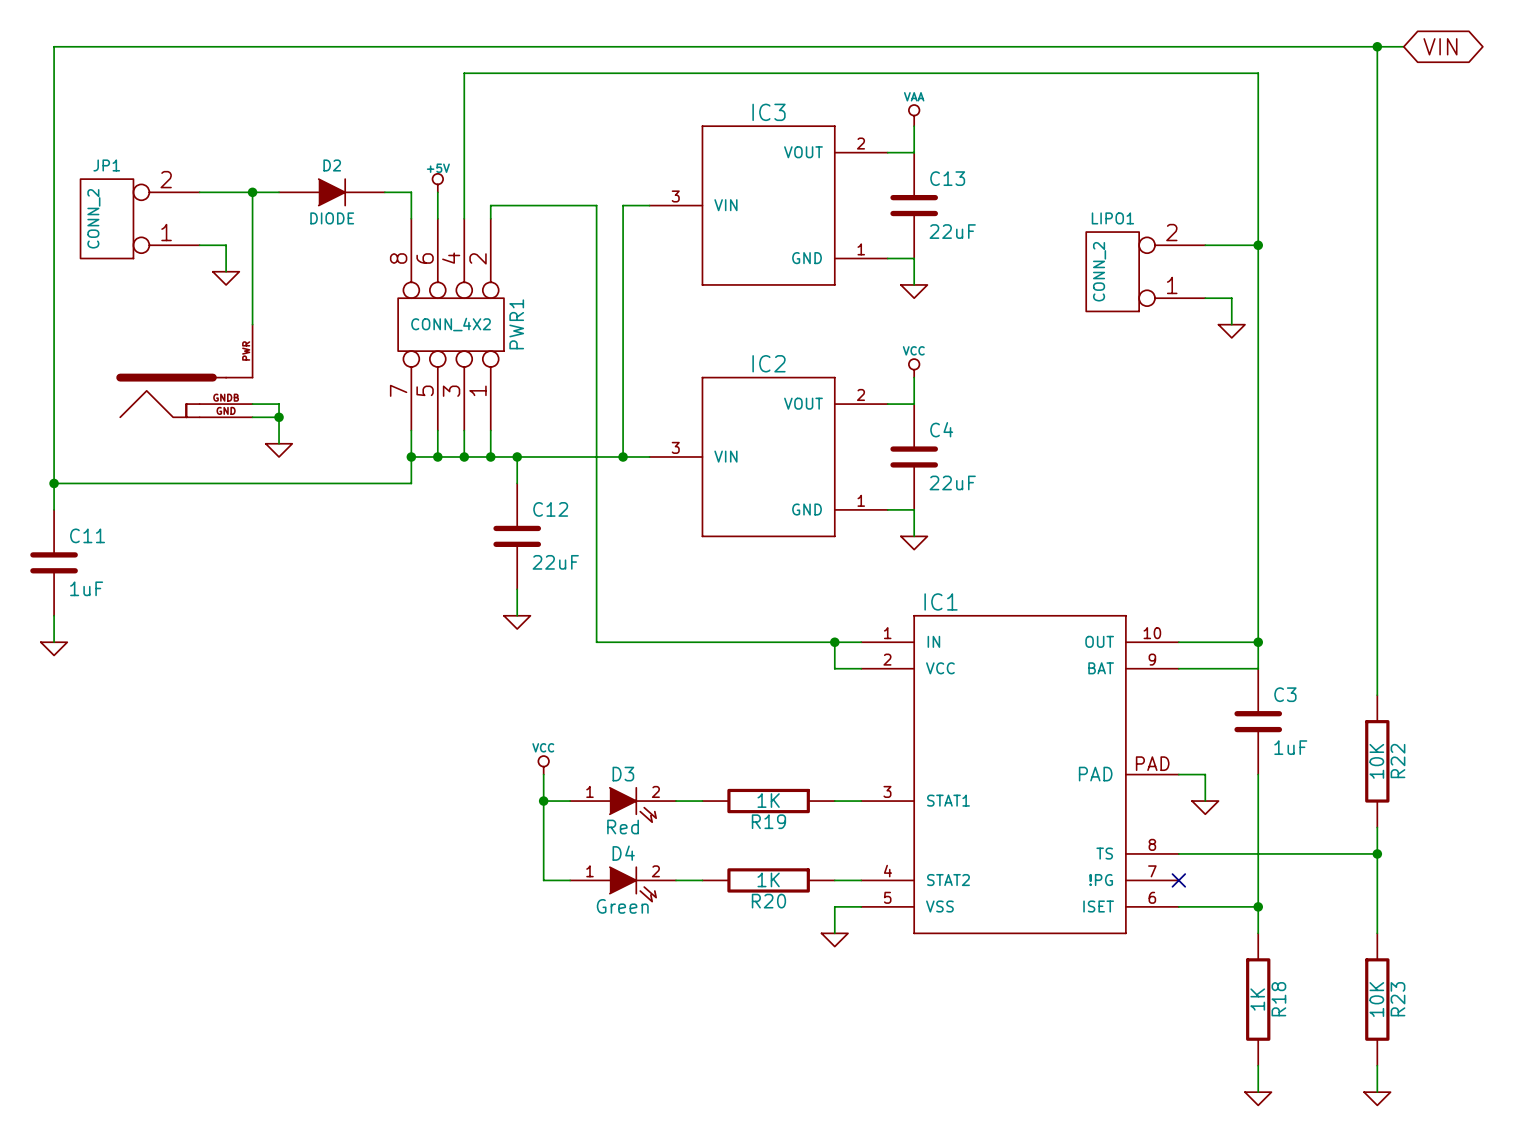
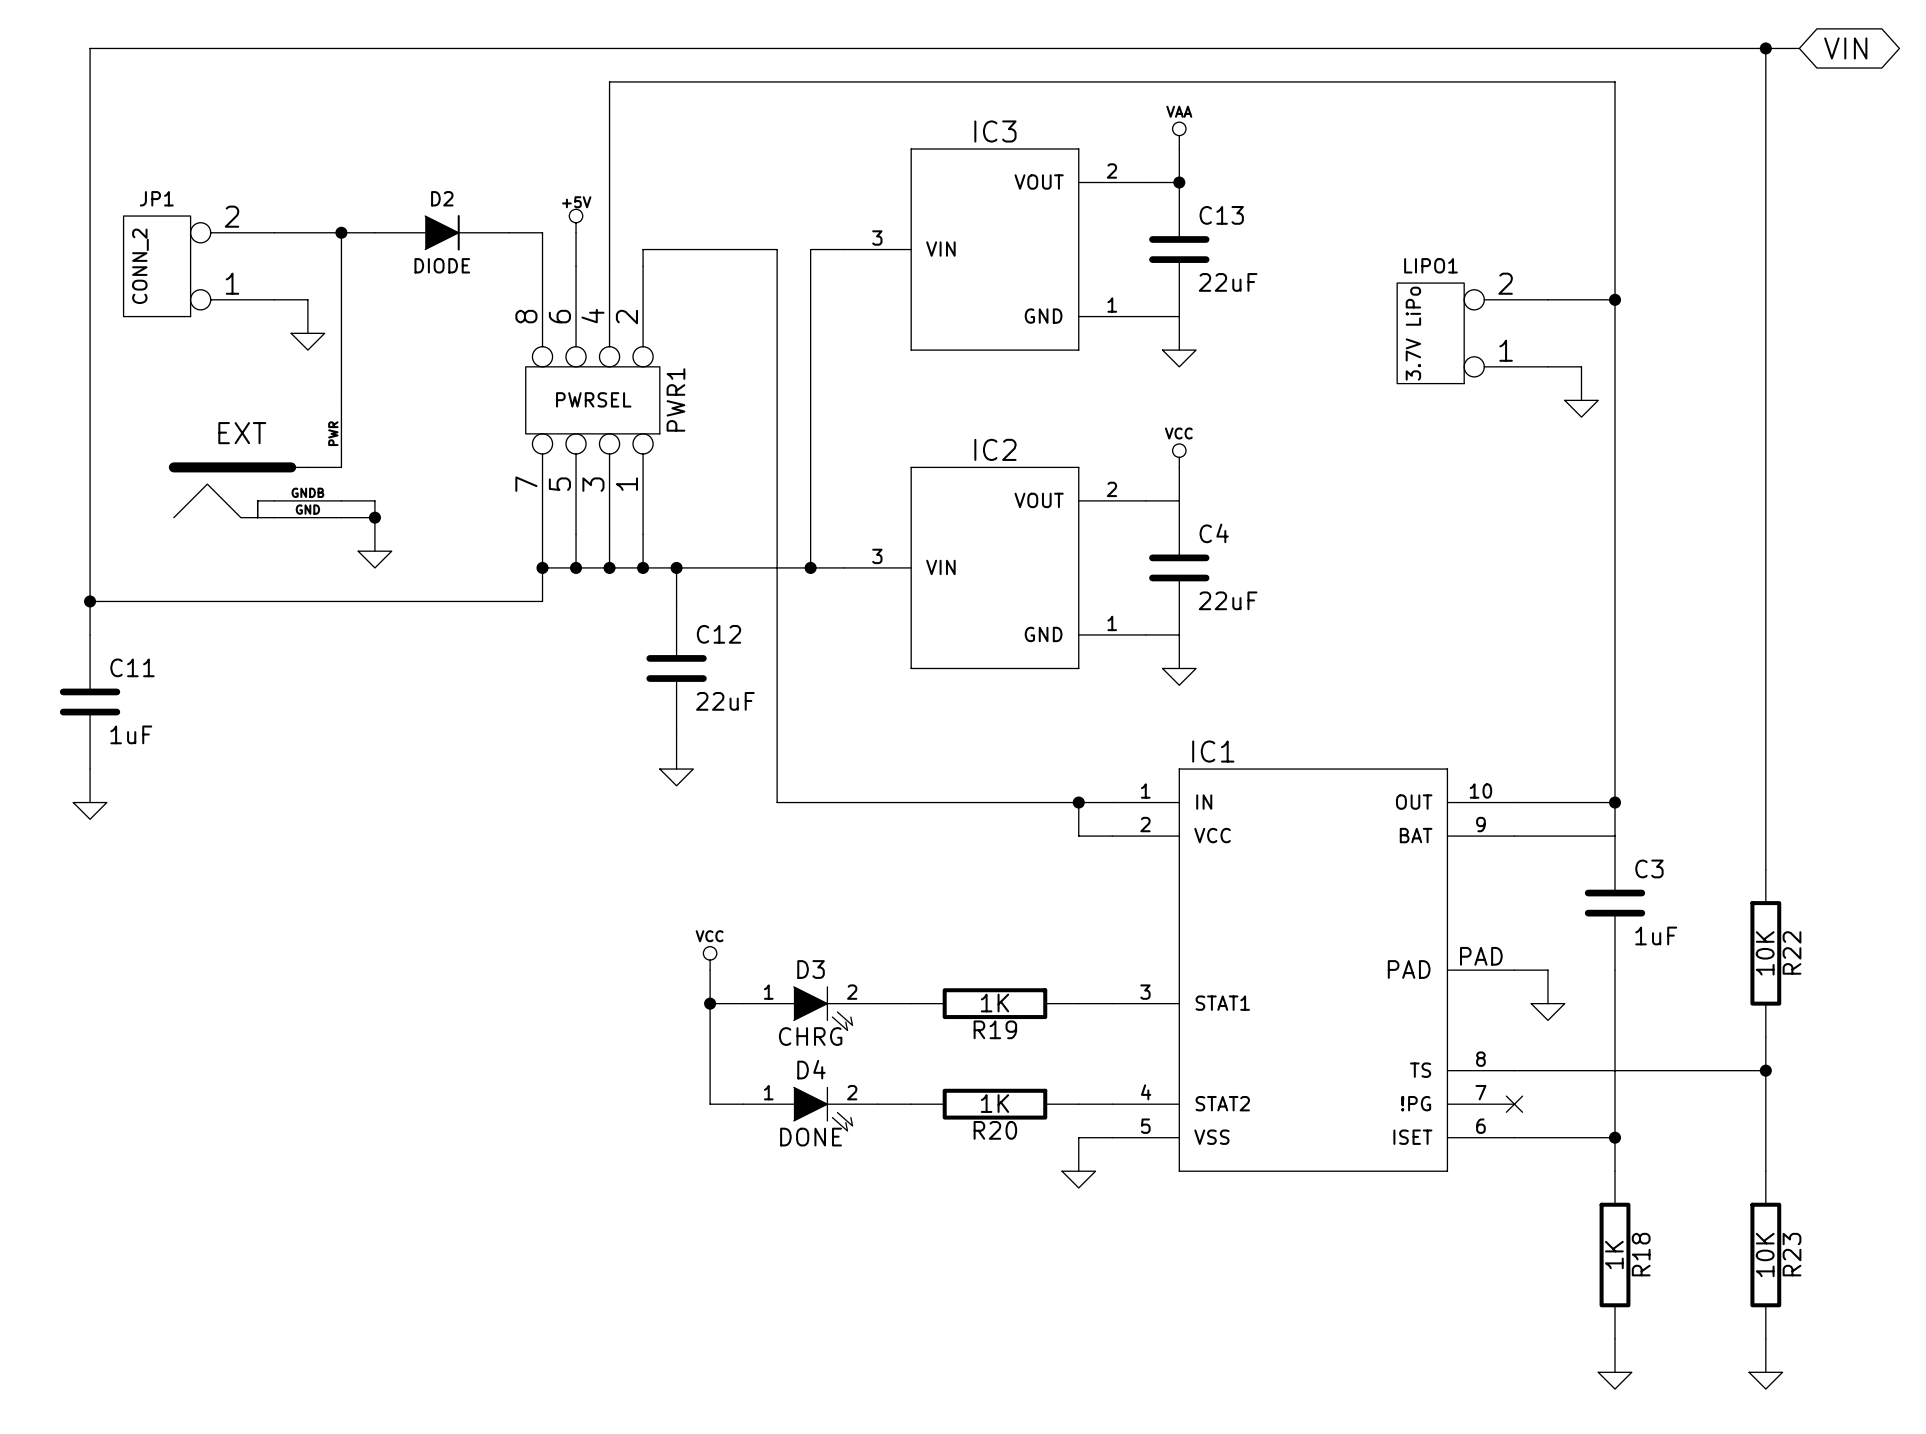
junction: none -> (1179, 182)
LIPO1 value: CONN_2 (1099, 271) -> 3.7V LiPo (1413, 333)
PWR1 value: CONN_4X2 (451, 324) -> PWRSEL (593, 399)
part value: none -> EXT (242, 433)
D3 value: Red (623, 827) -> CHRG (810, 1036)
D4 value: Green (622, 906) -> DONE (811, 1137)

